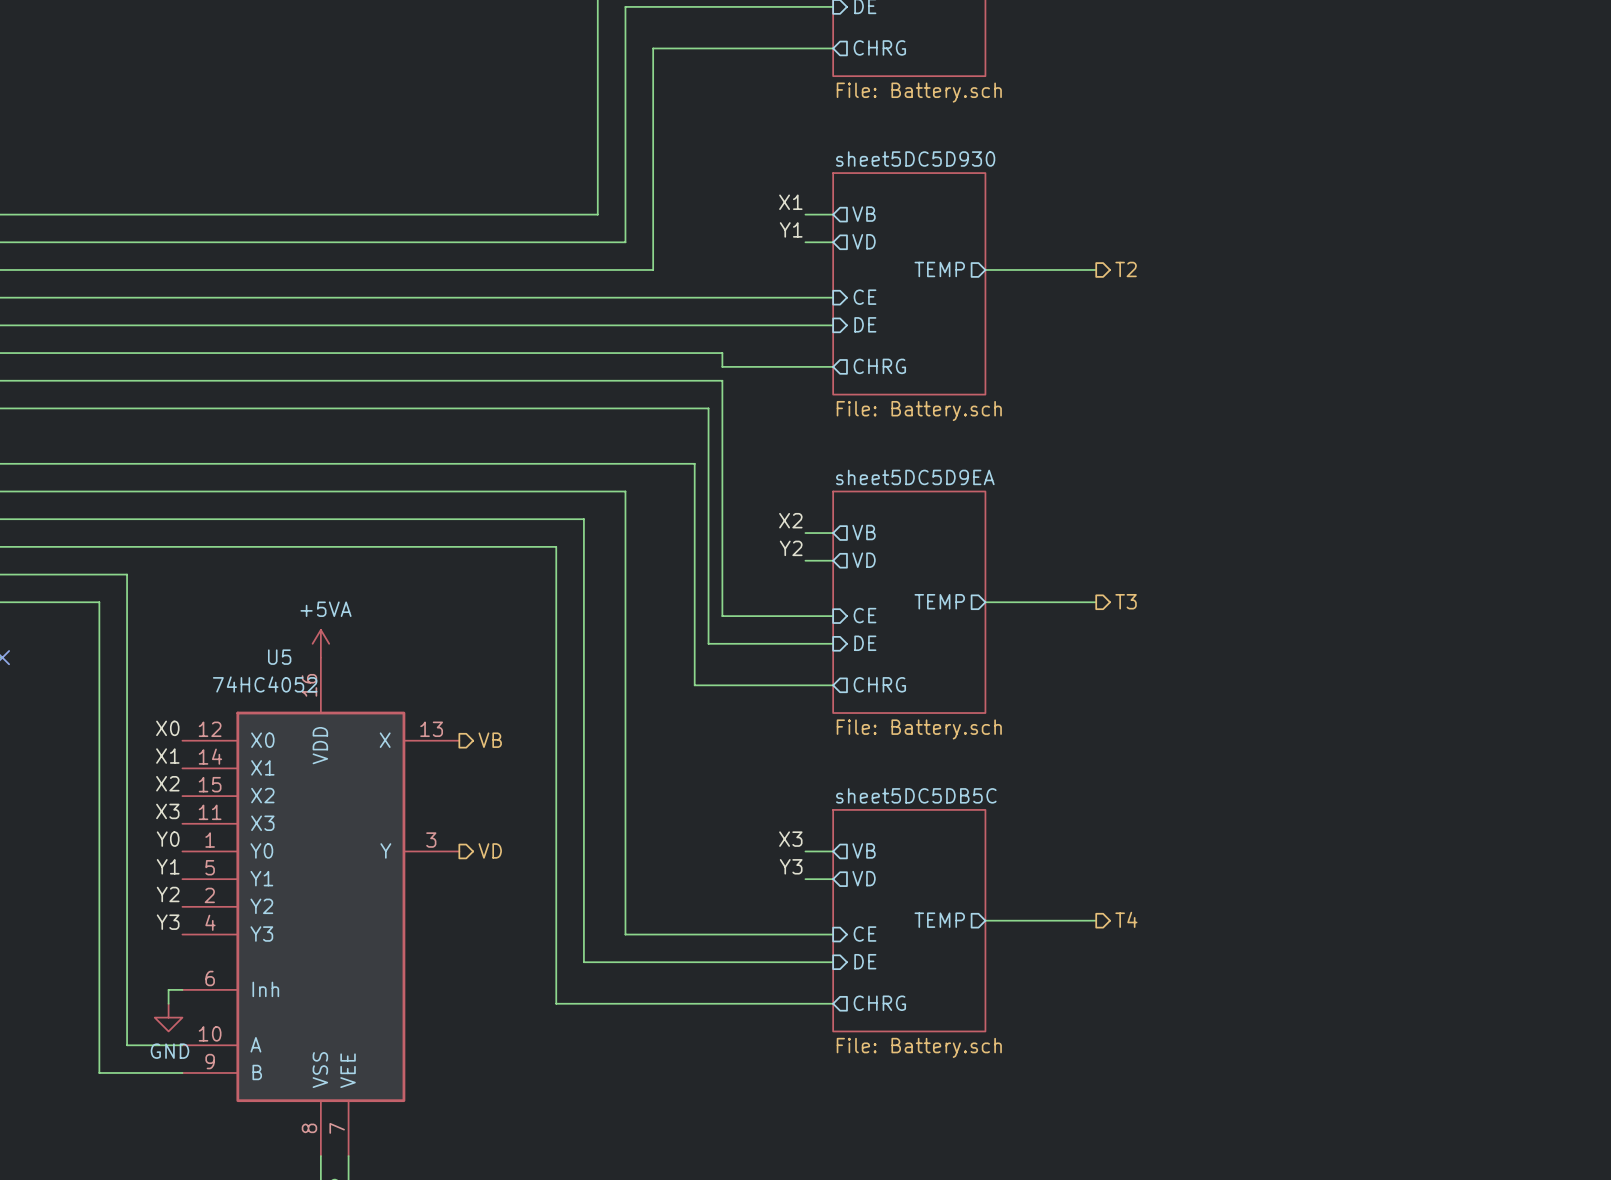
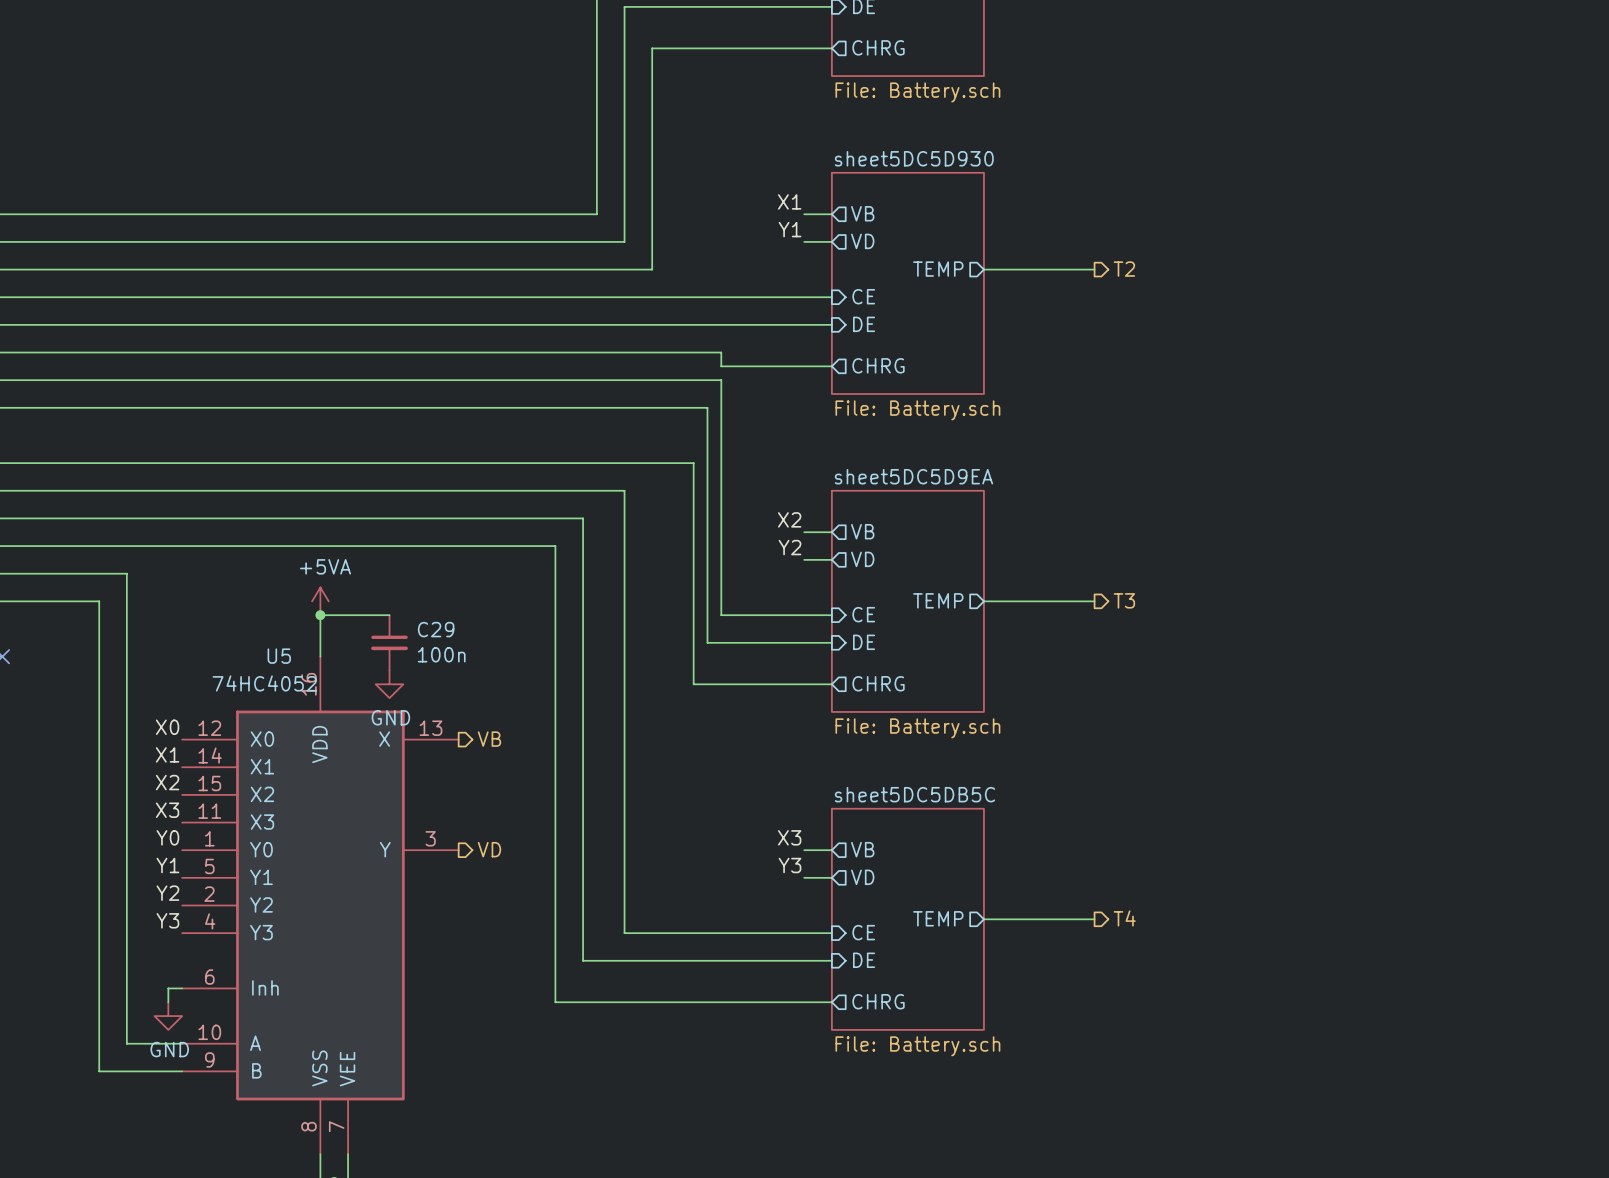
junction: none -> (320, 615)
wire: none -> (389, 615) (320, 615) (320, 656)
power symbol position: +5VA (320, 643) -> +5VA (320, 601)
C29: none -> 100n (389, 642)
power symbol: none -> GND (389, 684)

